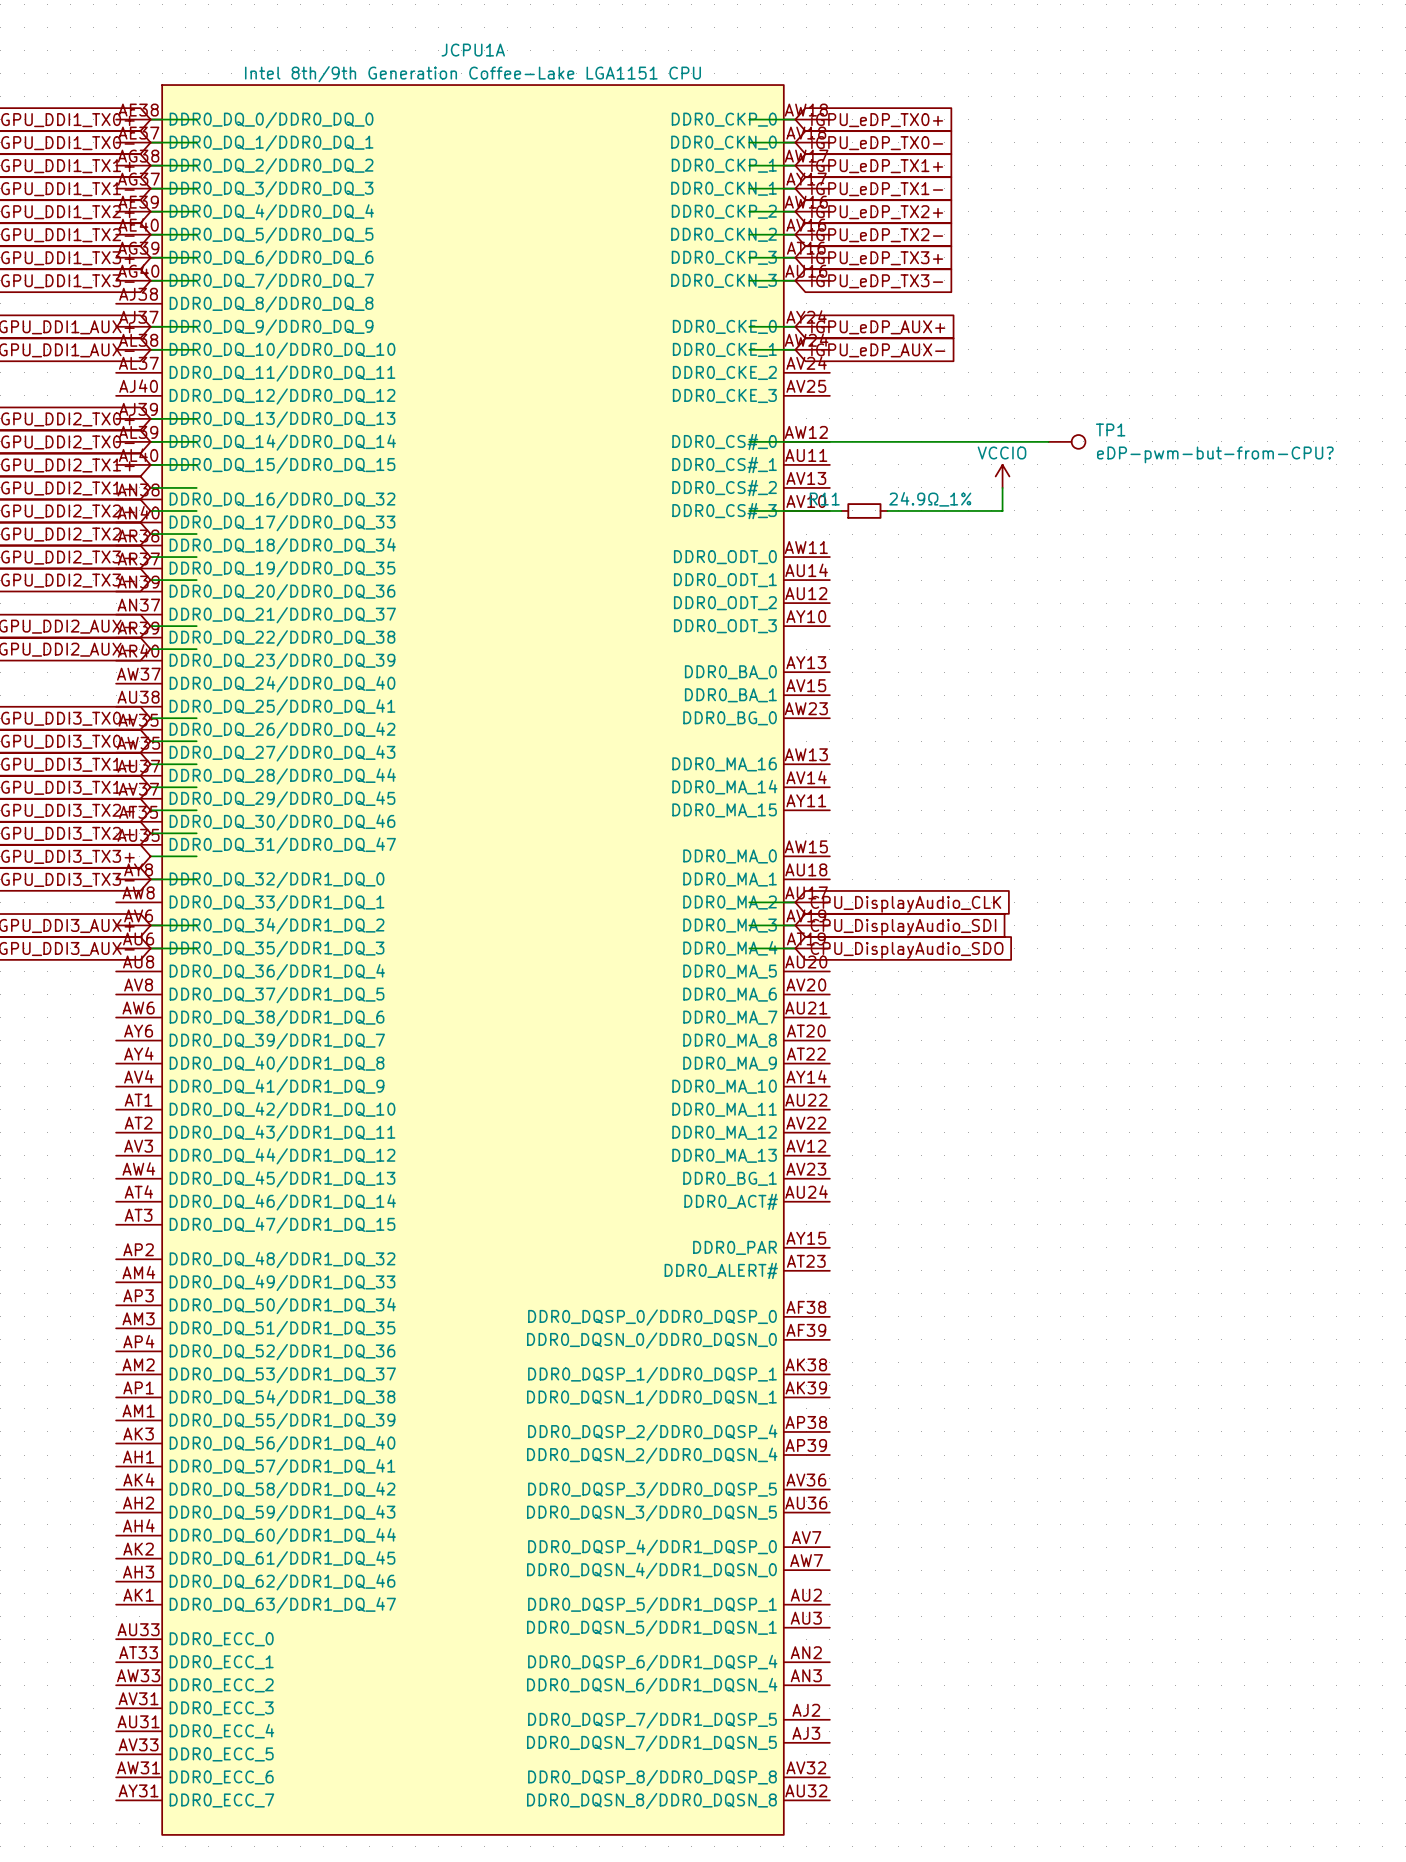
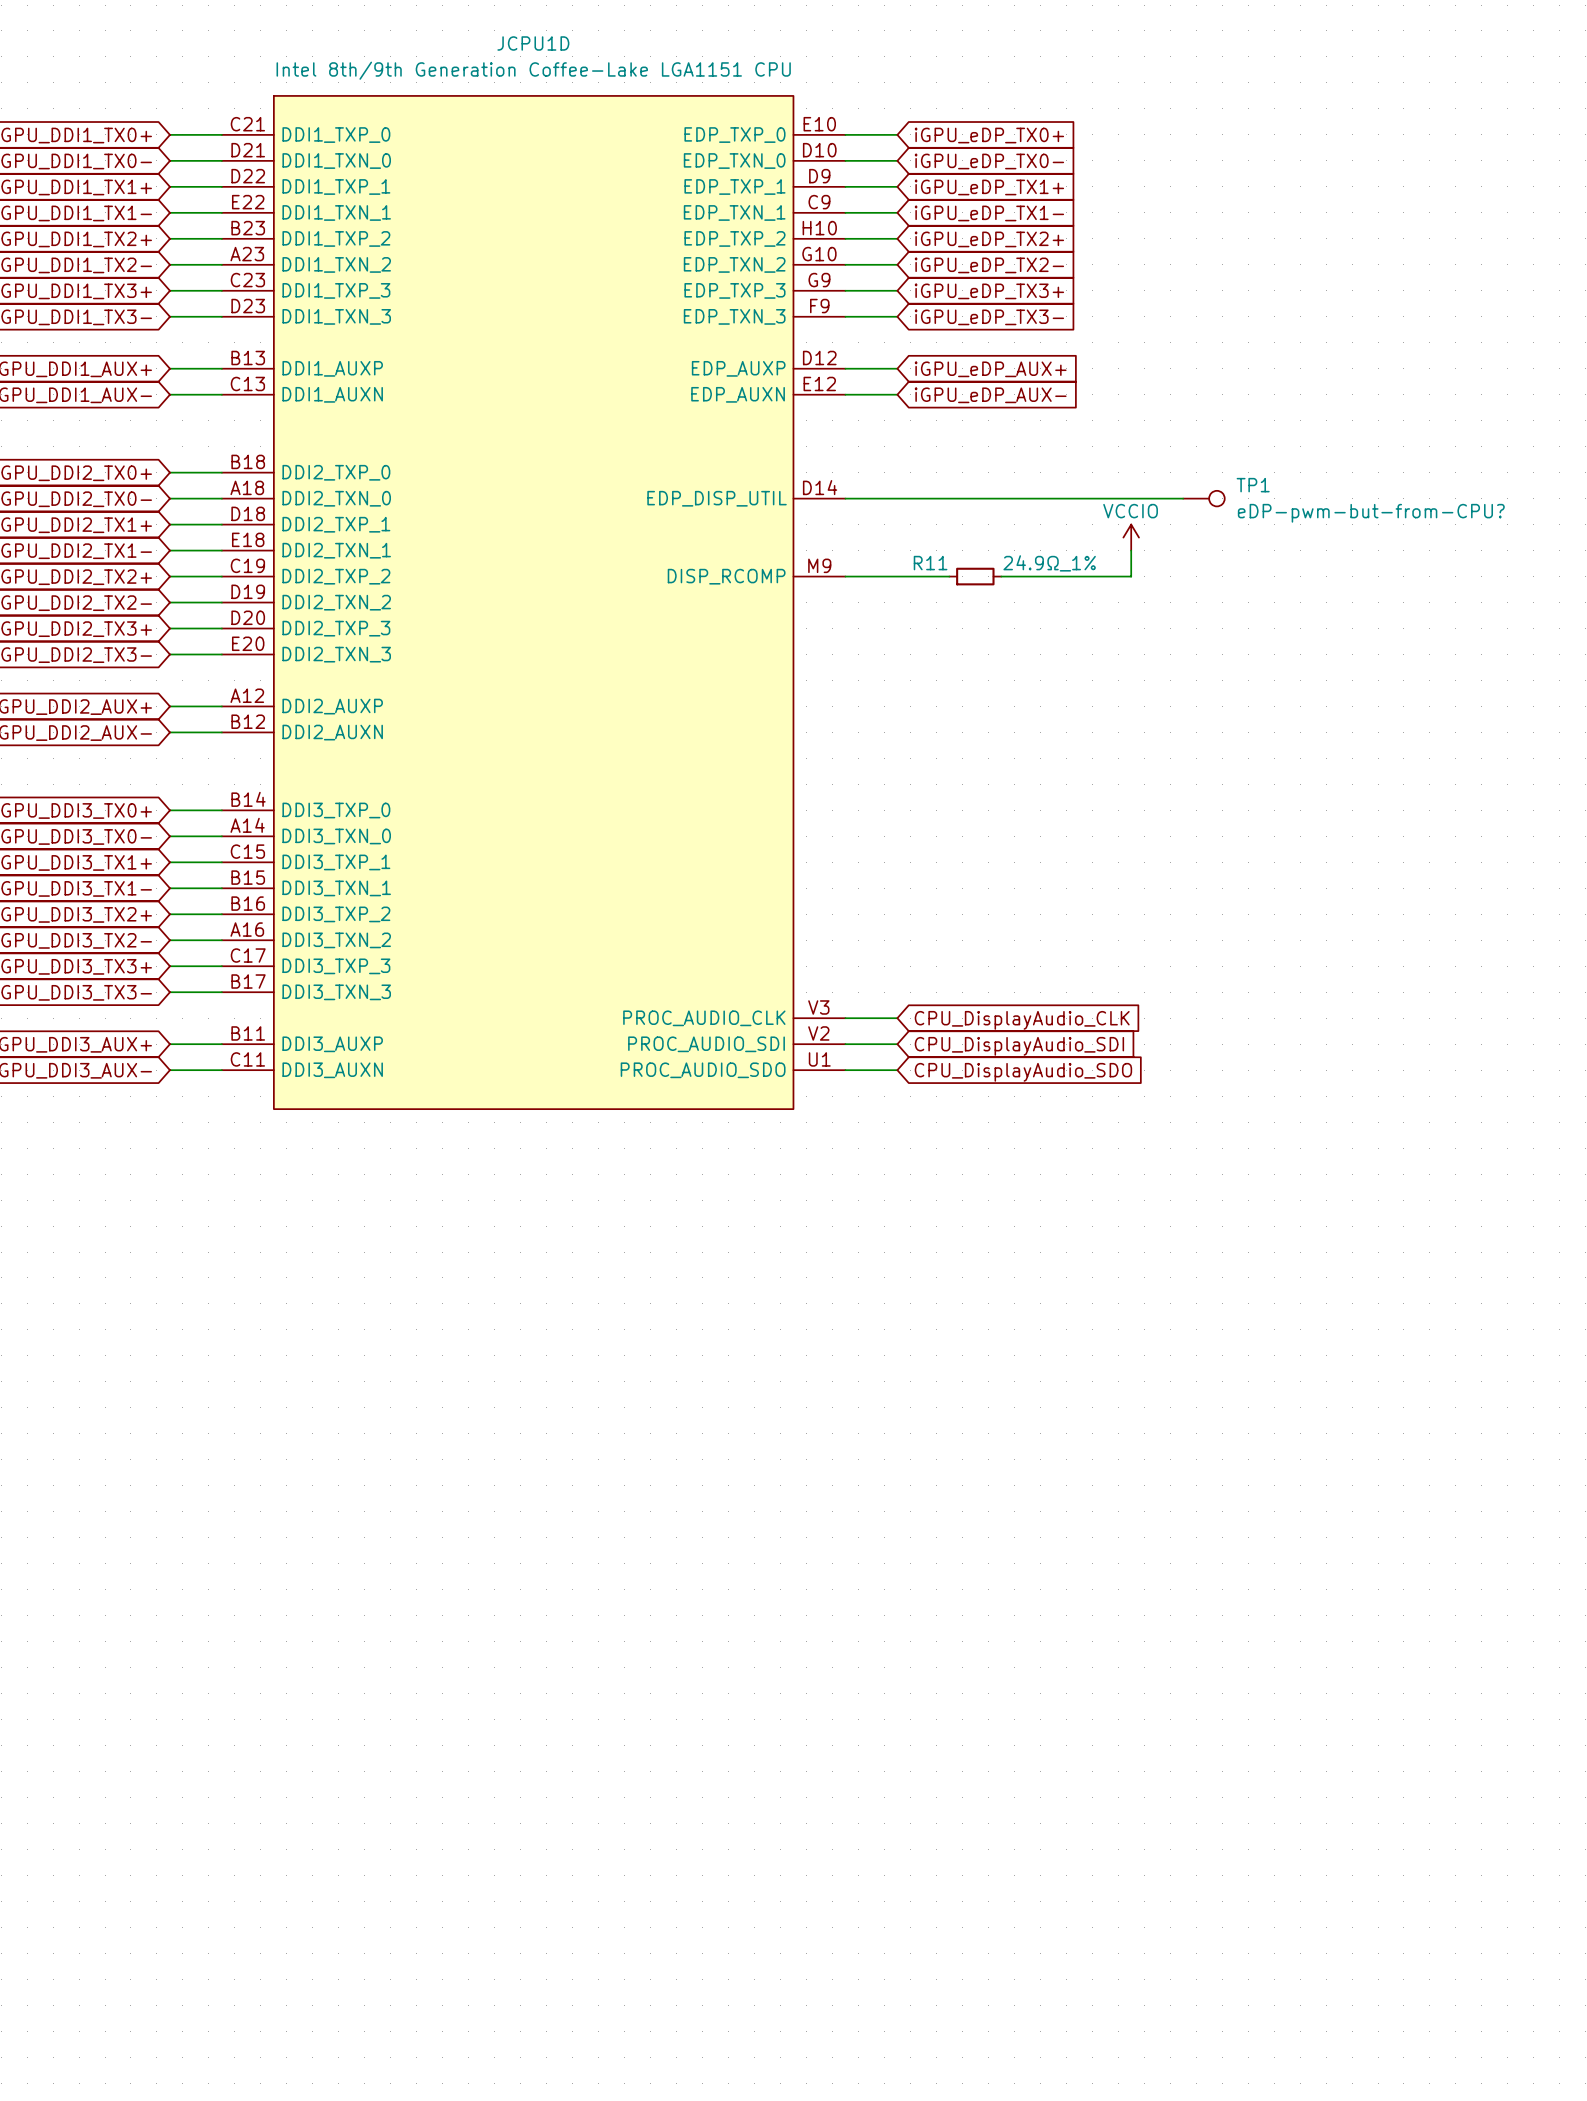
JCPU1D: none -> Intel 8th/9th Generation Coffee-Lake LGA1151 CPU (533, 602)
JCPU1A: Intel 8th/9th Generation Coffee-Lake LGA1151 CPU (472, 959) -> none

